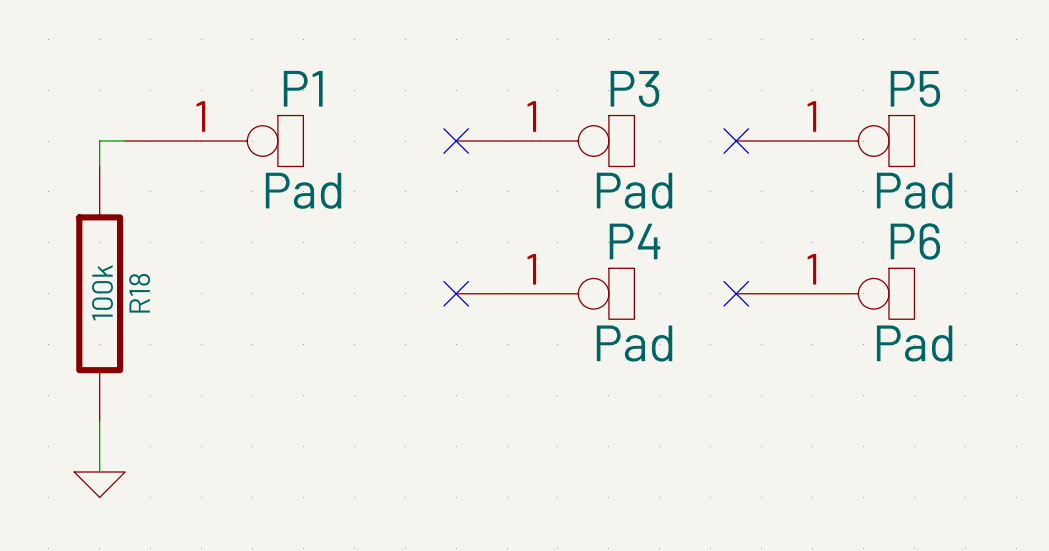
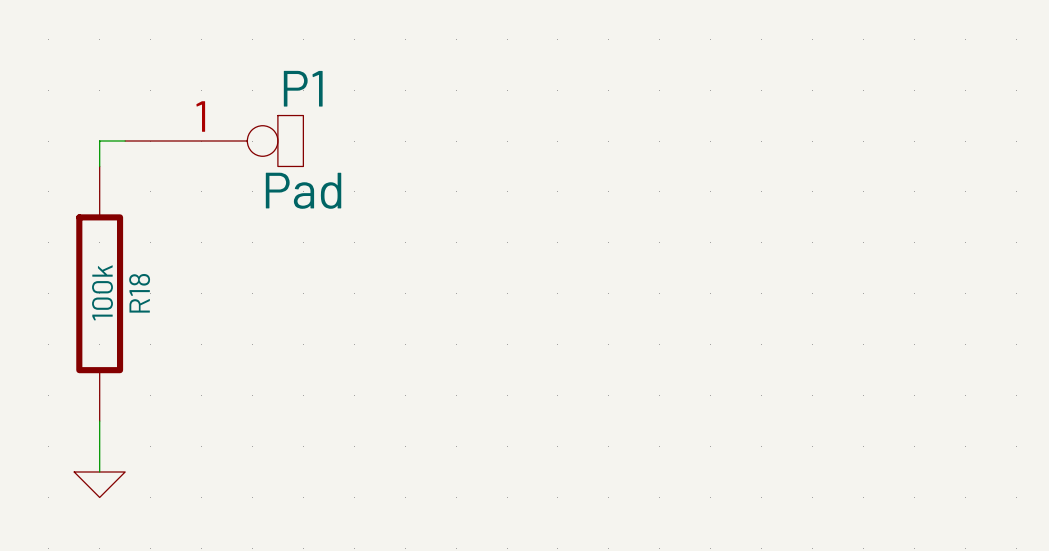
no-connect mark: (456, 141) -> none
P3: Pad (545, 141) -> none
no-connect mark: (736, 141) -> none
P5: Pad (825, 141) -> none
no-connect mark: (456, 293) -> none
P4: Pad (545, 293) -> none
no-connect mark: (736, 293) -> none
P6: Pad (825, 293) -> none

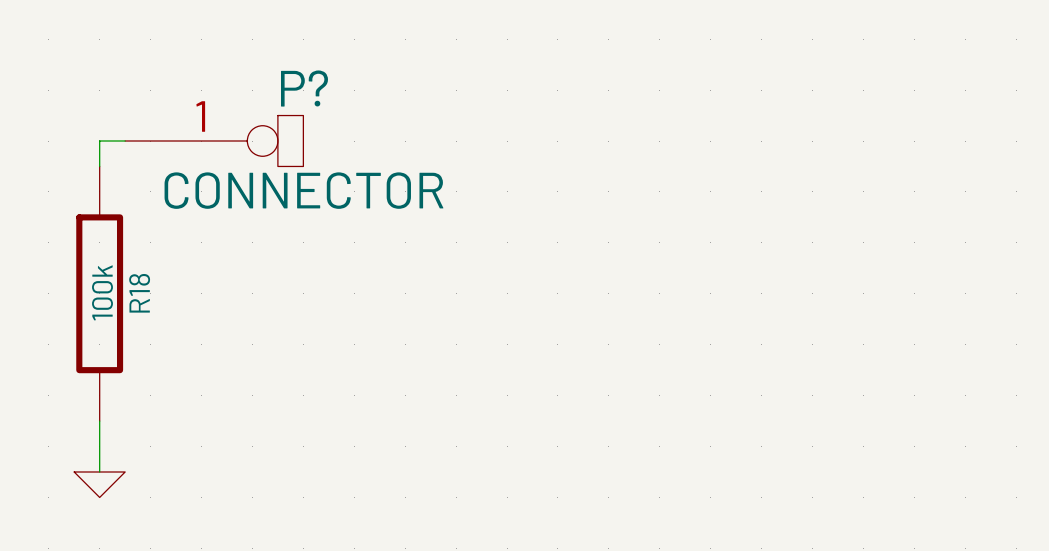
P1 name: P1 (303, 88) -> P? (304, 88)
P1 value: Pad (303, 190) -> CONNECTOR (303, 190)

